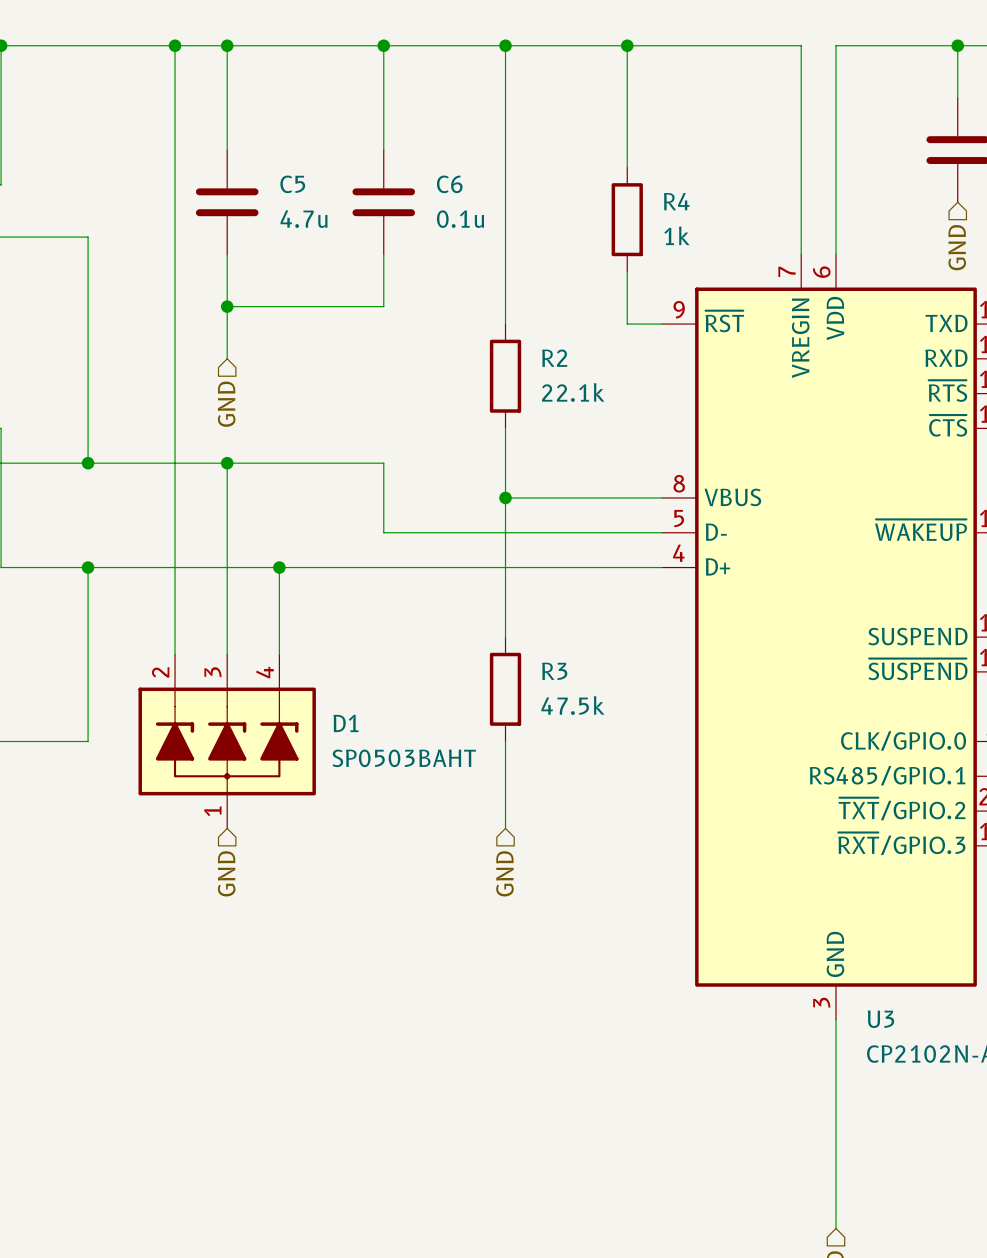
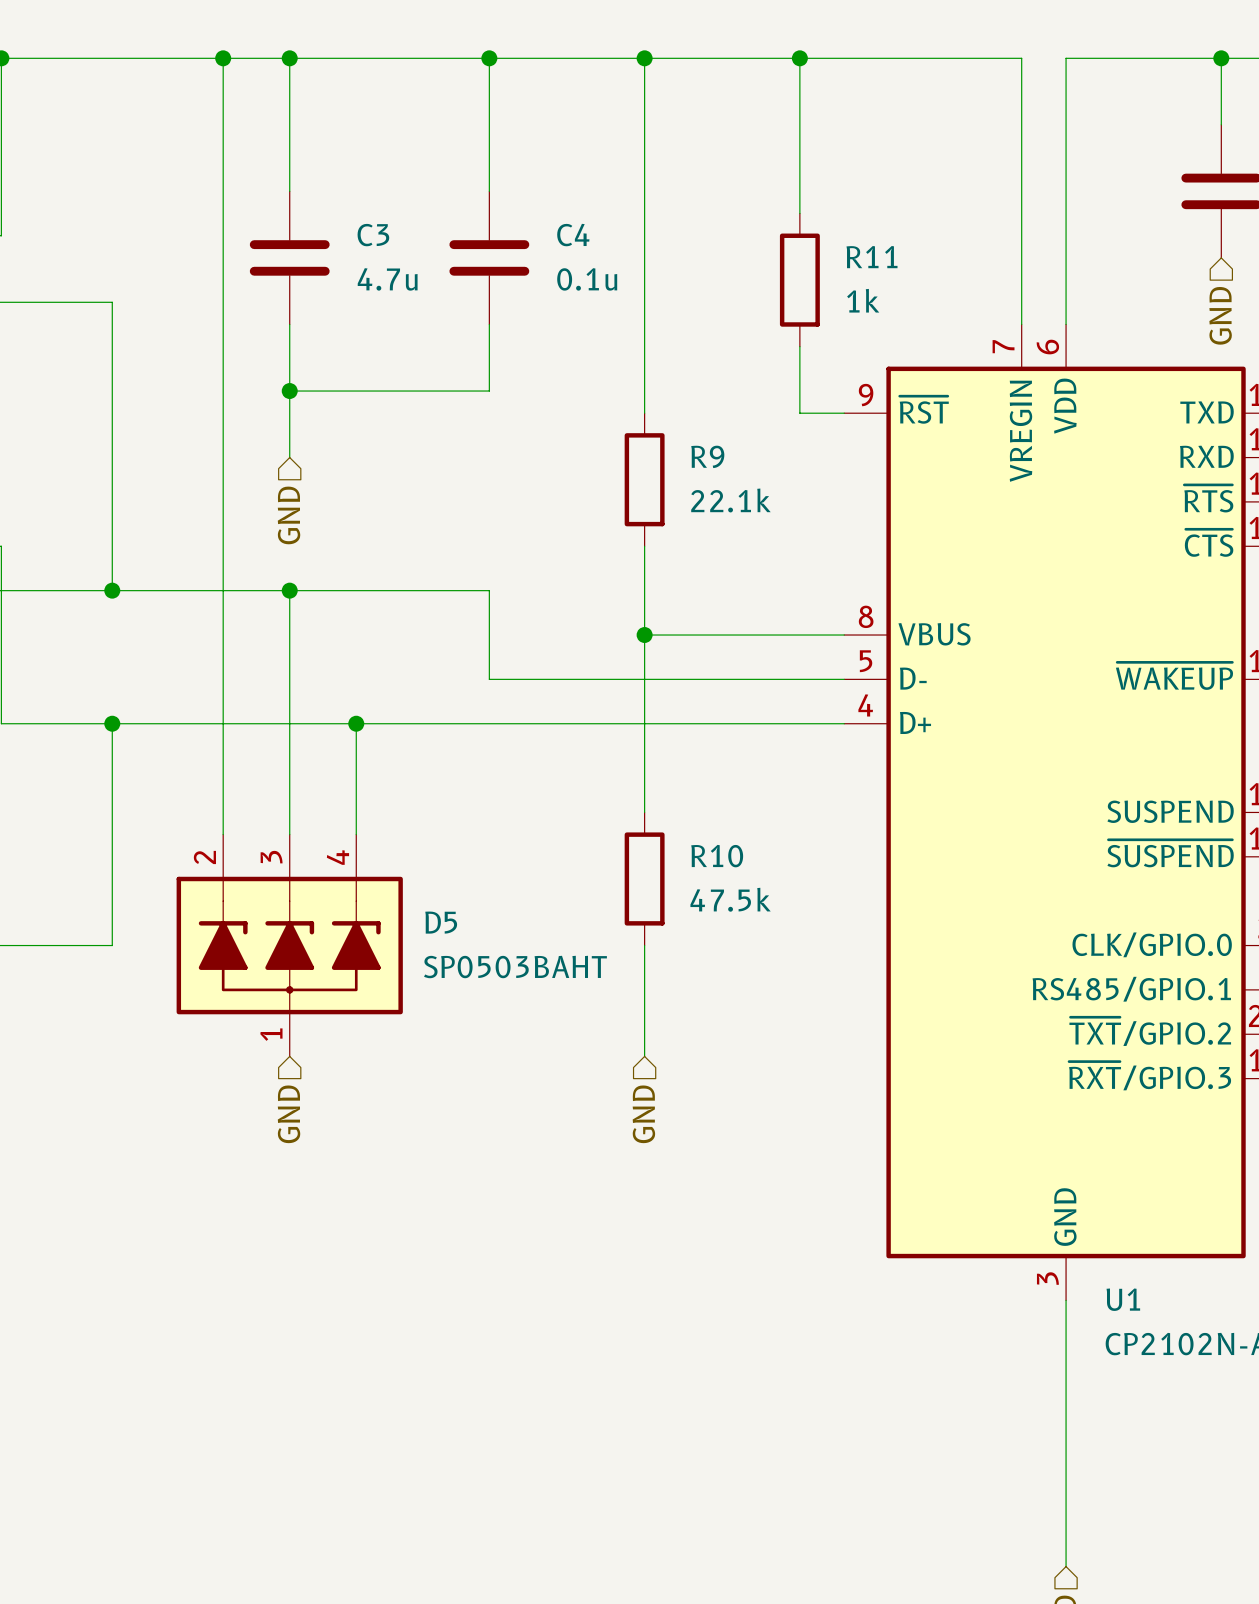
C5 name: C5 (292, 184) -> C3 (373, 235)
C6 name: C6 (449, 184) -> C4 (573, 235)
R4 name: R4 (676, 201) -> R11 (872, 257)
R2 name: R2 (554, 358) -> R9 (707, 456)
R3 name: R3 (554, 671) -> R10 (717, 856)
D1 name: D1 (345, 723) -> D5 (441, 922)
U3 name: U3 (880, 1019) -> U1 (1123, 1299)

